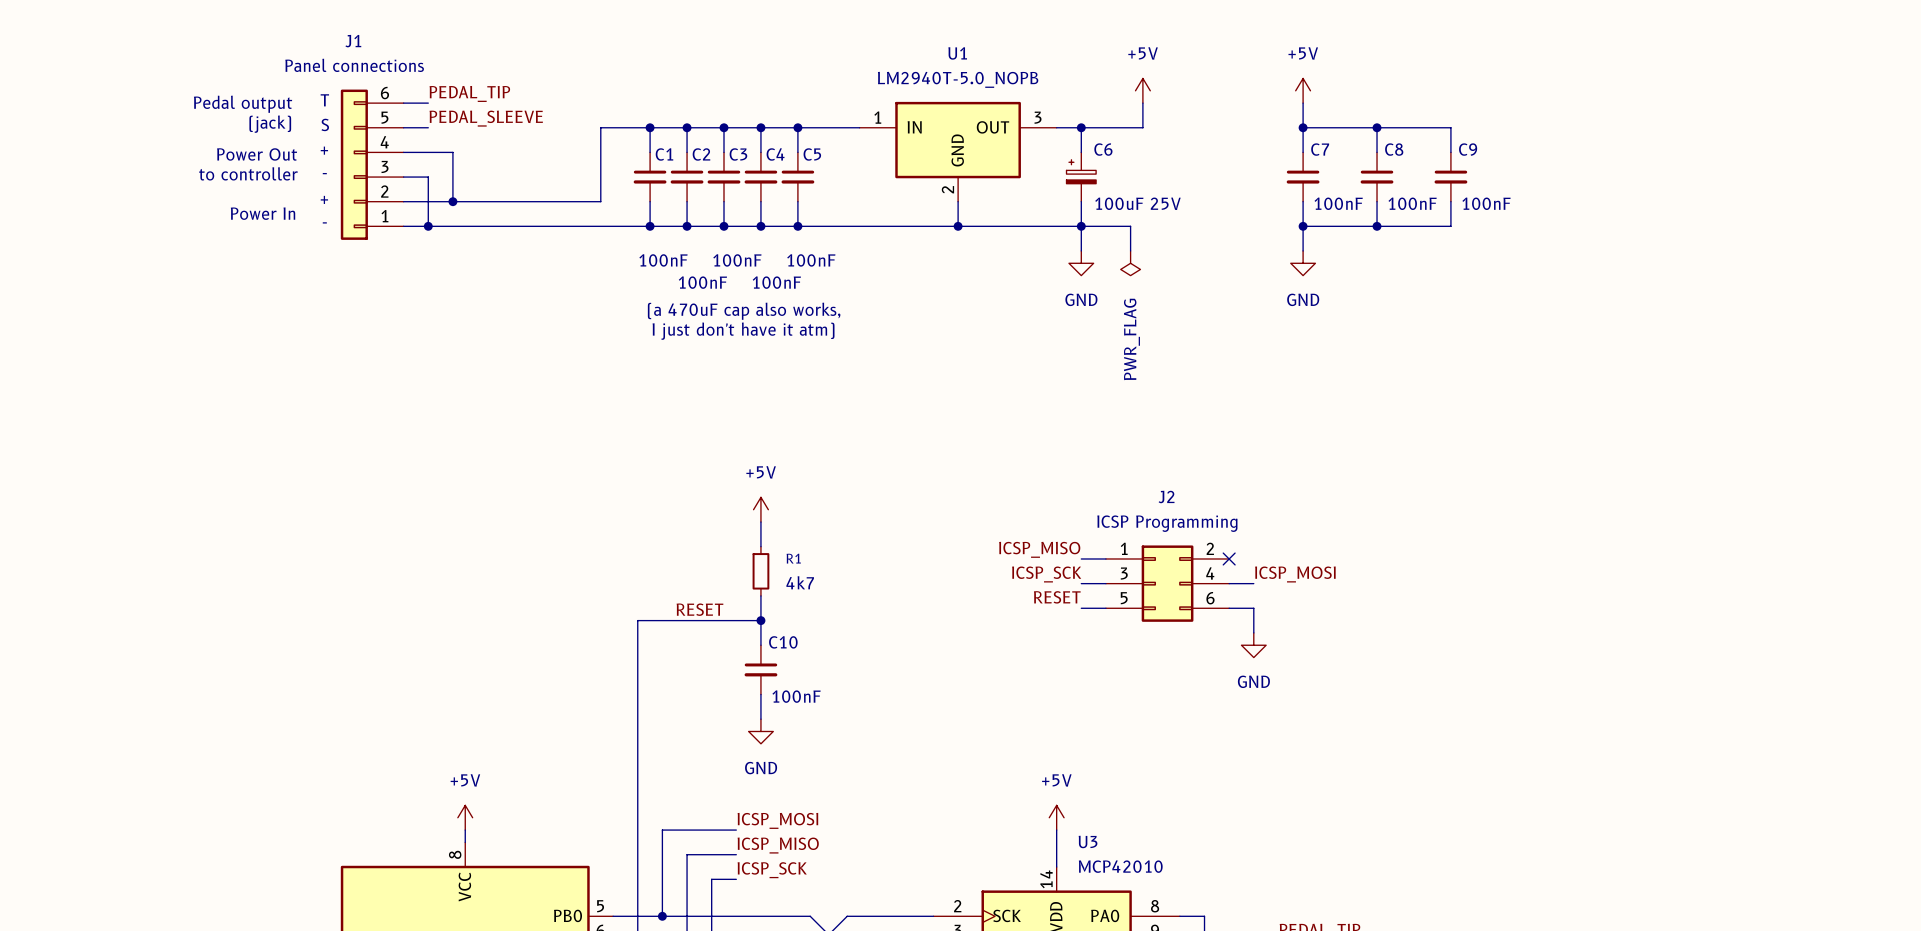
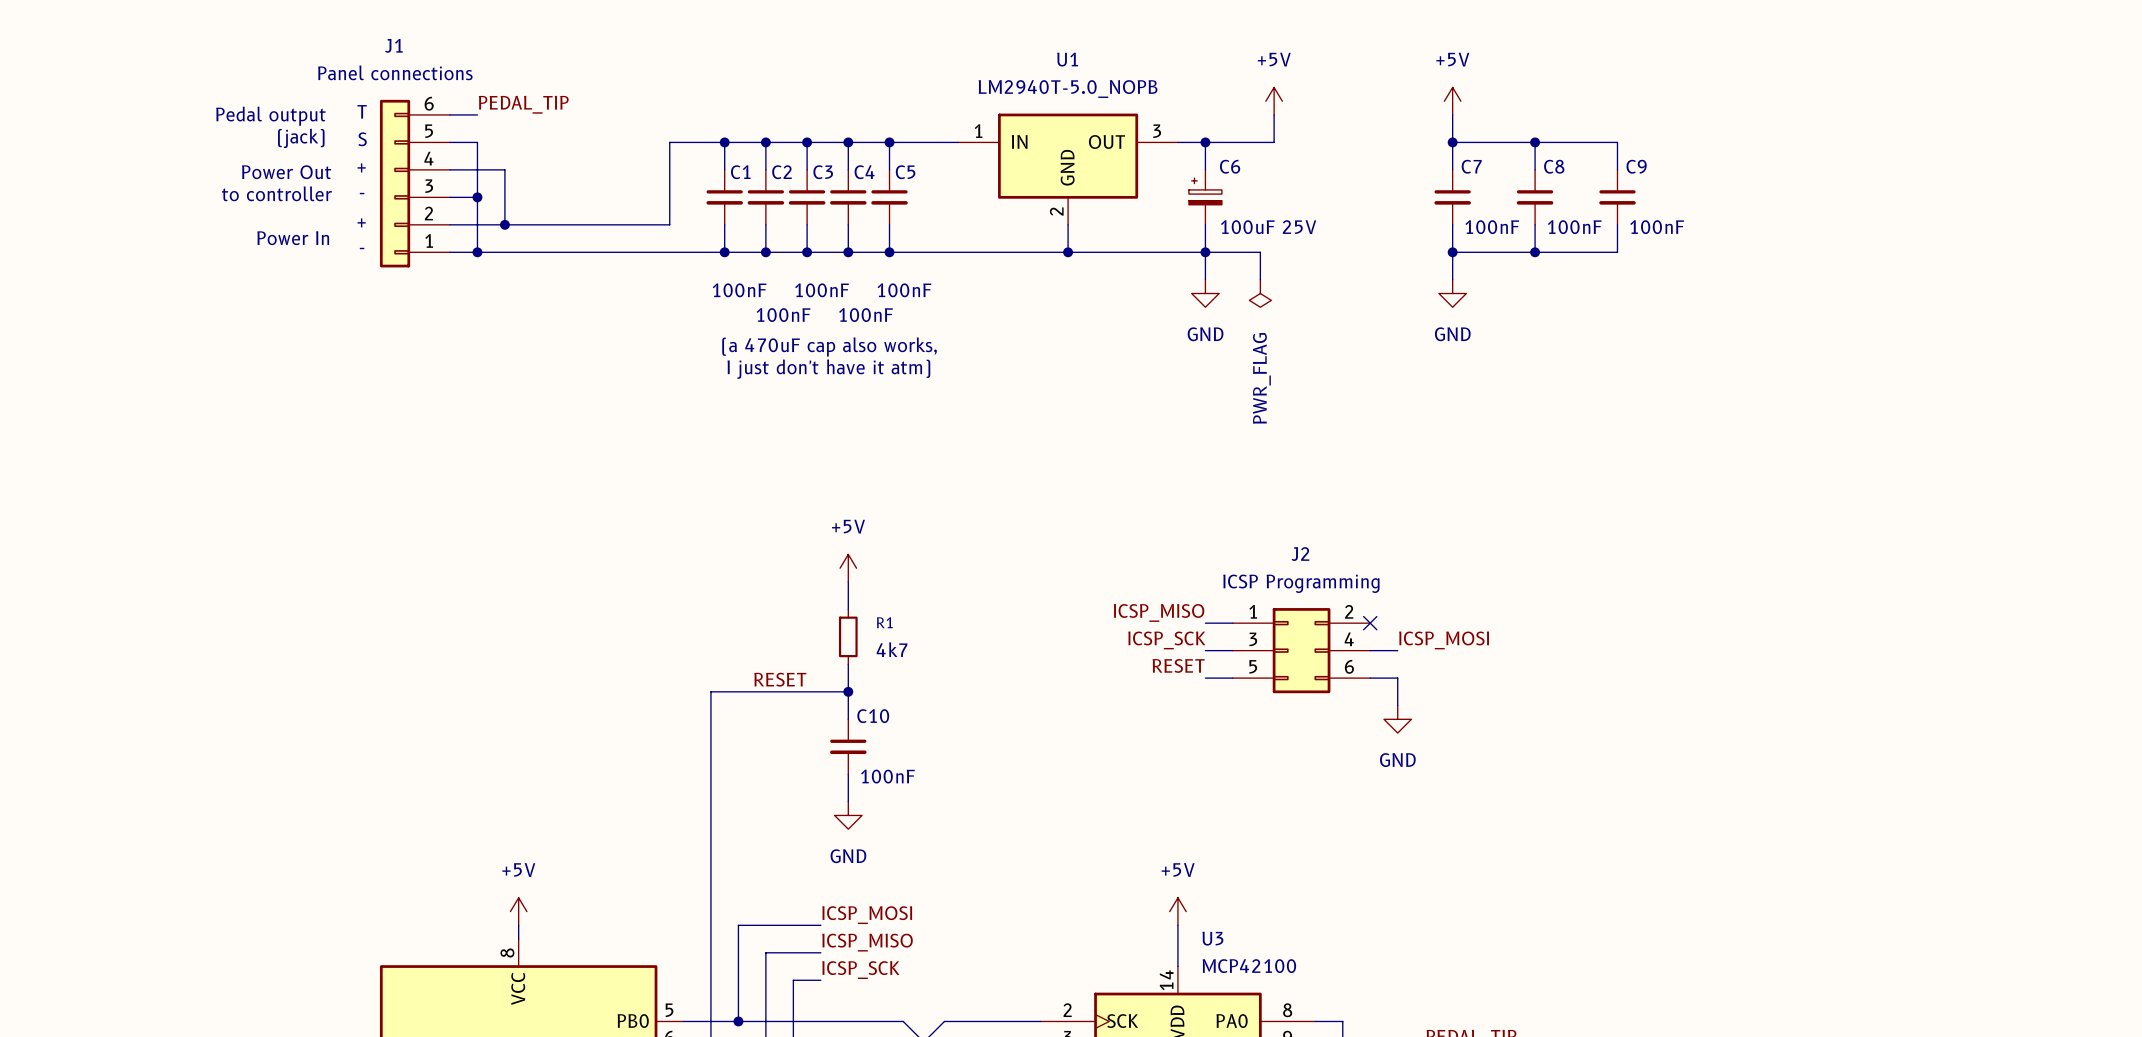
label: PEDAL_SLEEVE (486, 118) -> none
wire: none -> (477, 142) (477, 197)
junction: none -> (477, 197)
U3 value: MCP42010 (1120, 866) -> MCP42100 (1249, 966)

